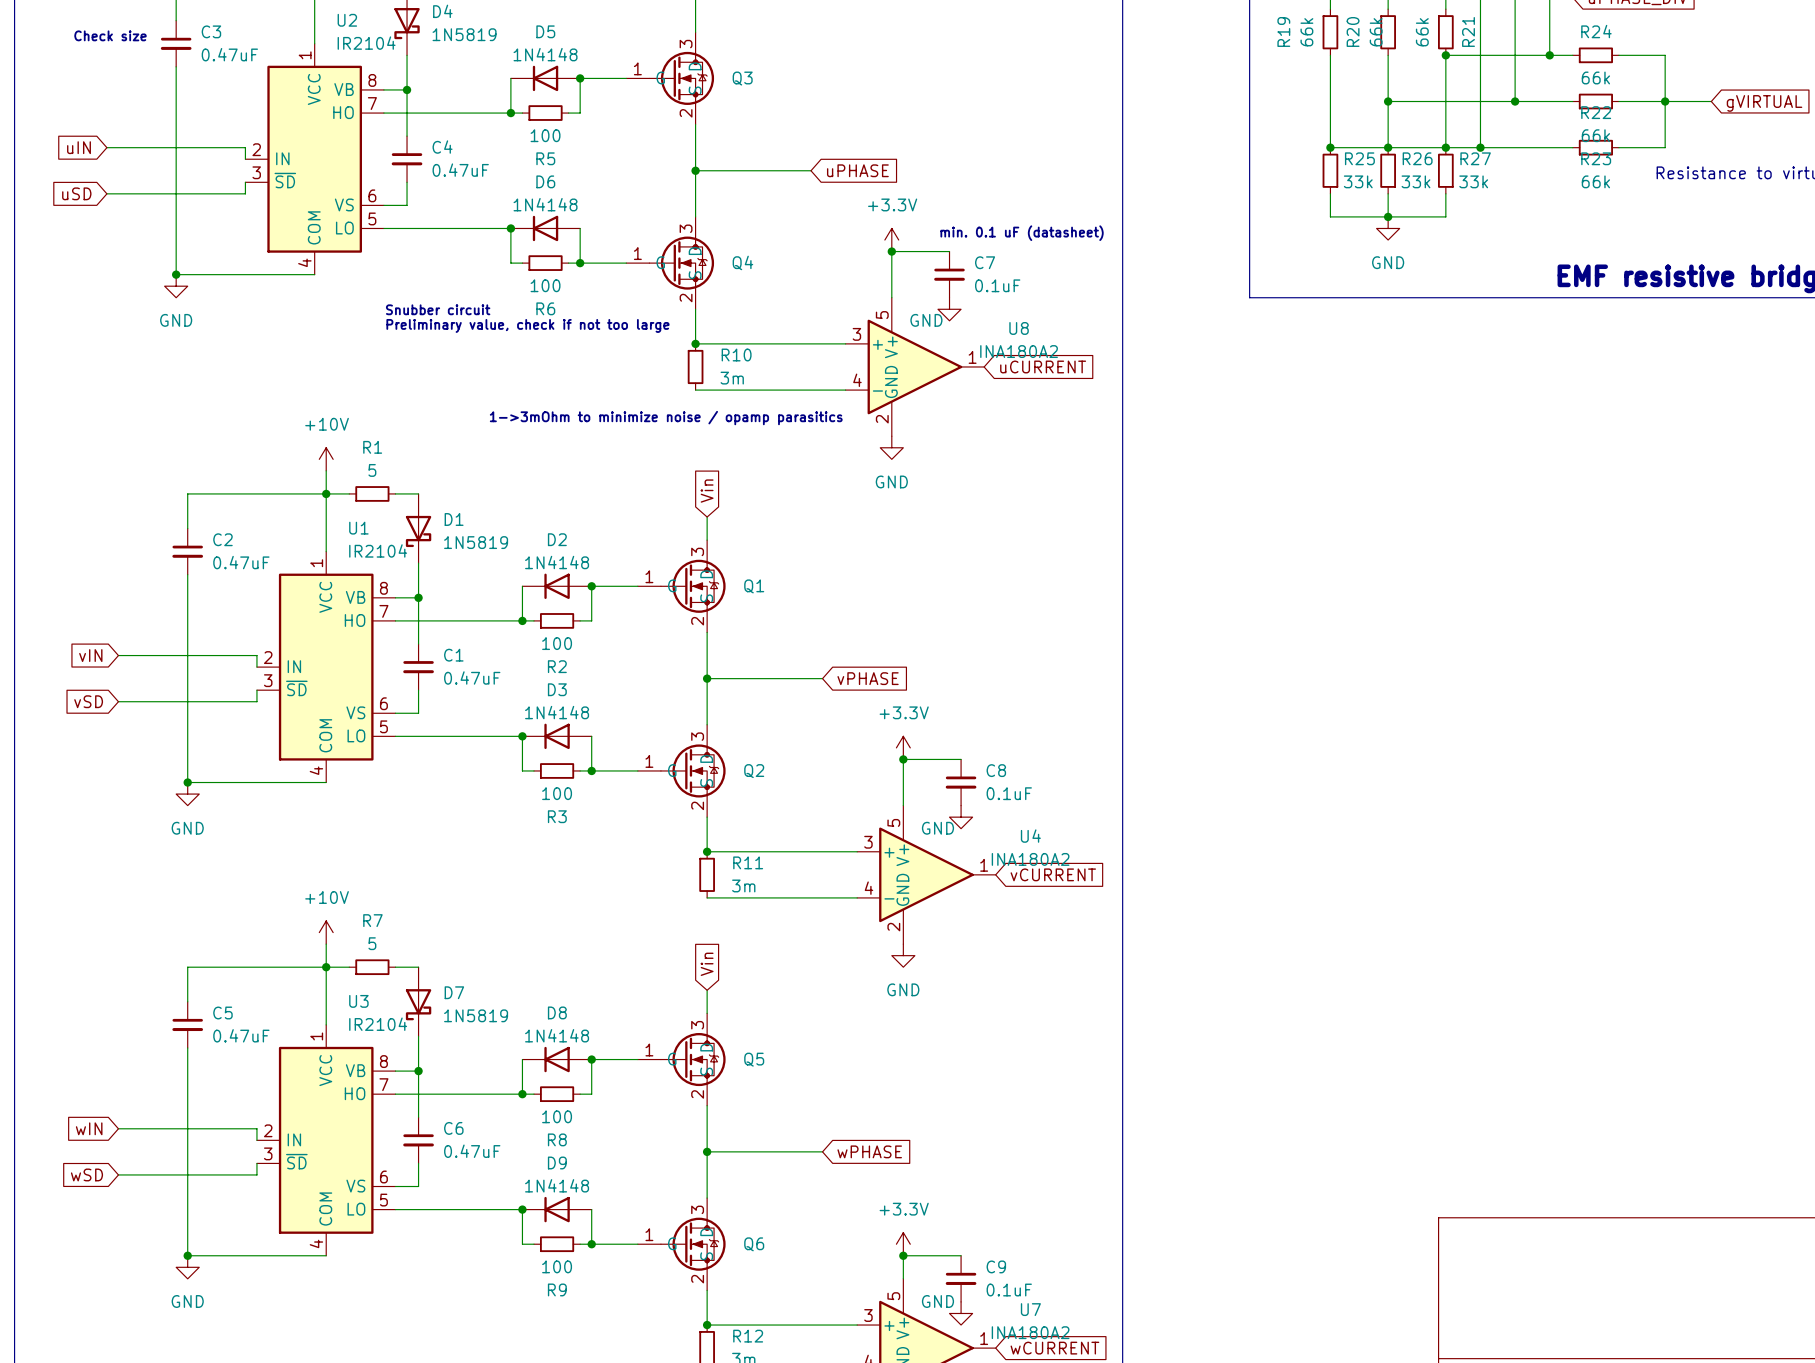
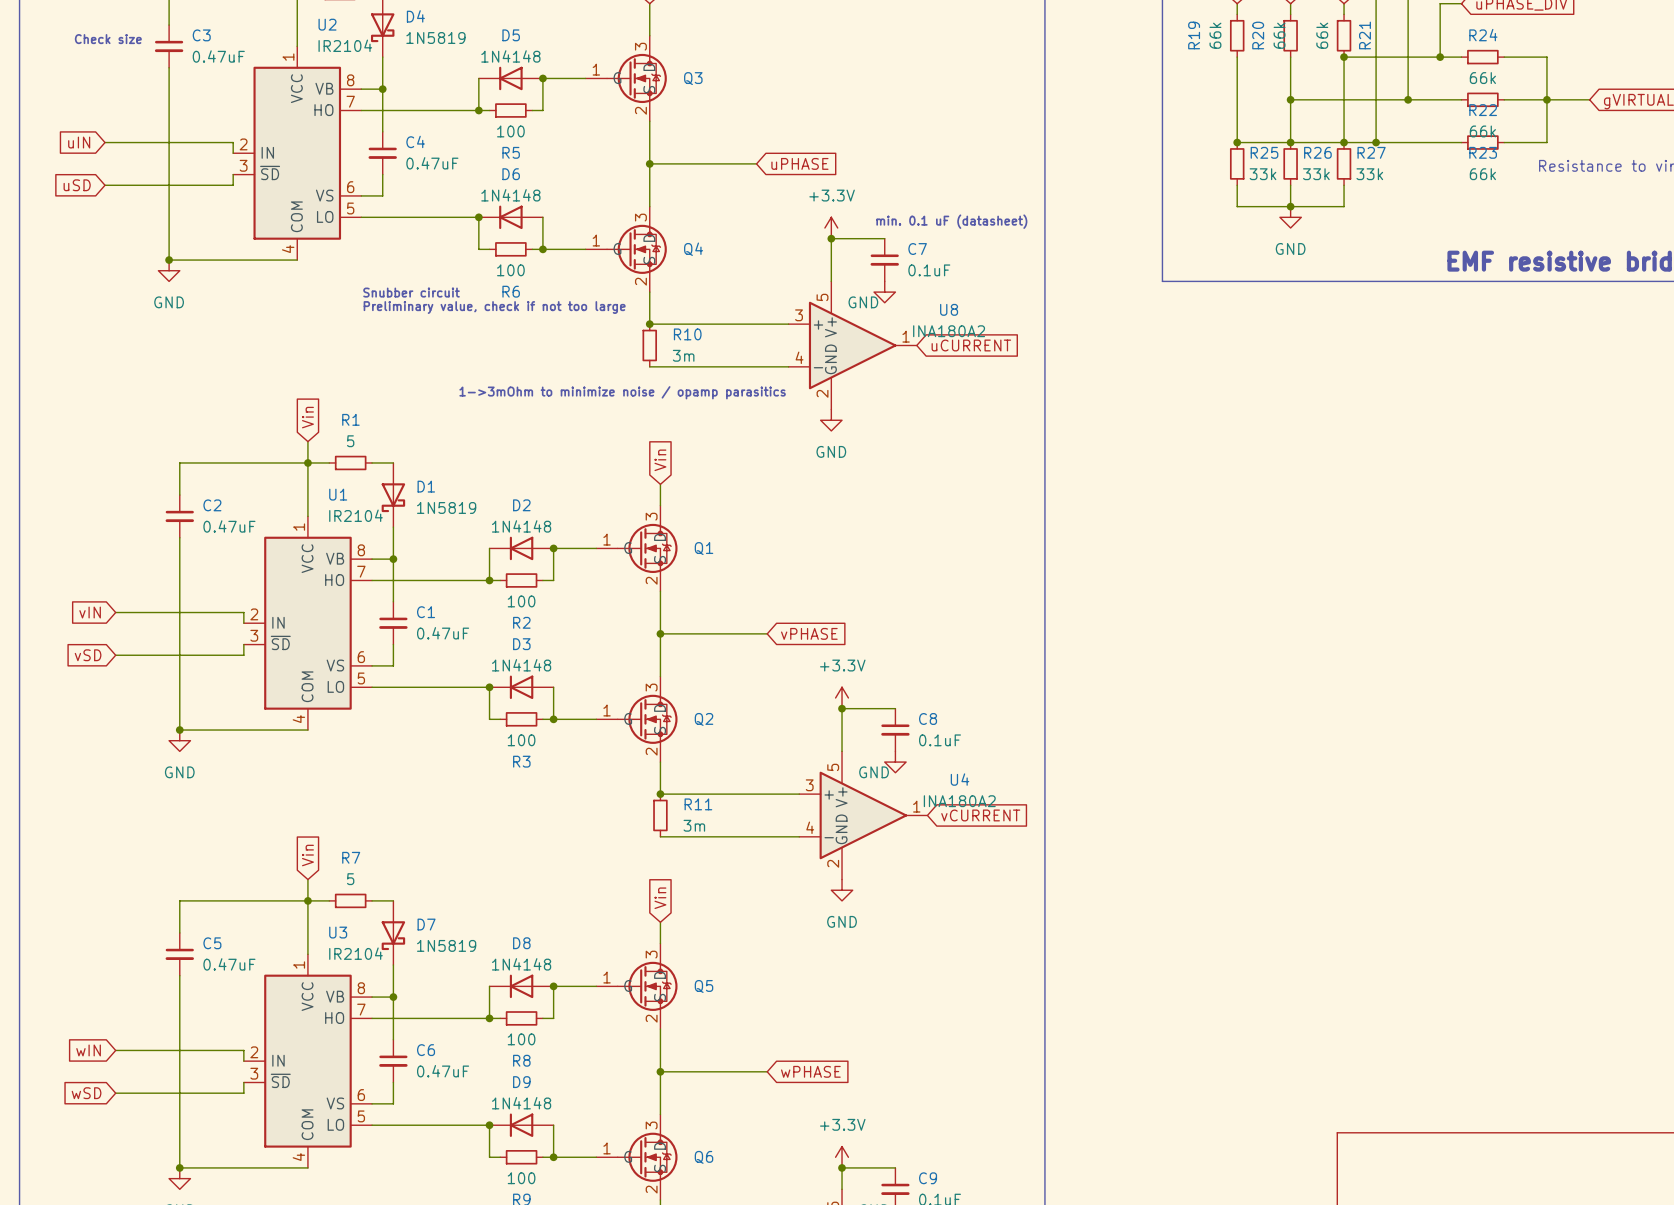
global label: none -> Vin (307, 417)
power symbol: +10V (326, 459) -> none
global label: none -> Vin (307, 855)
power symbol: +10V (326, 932) -> none

